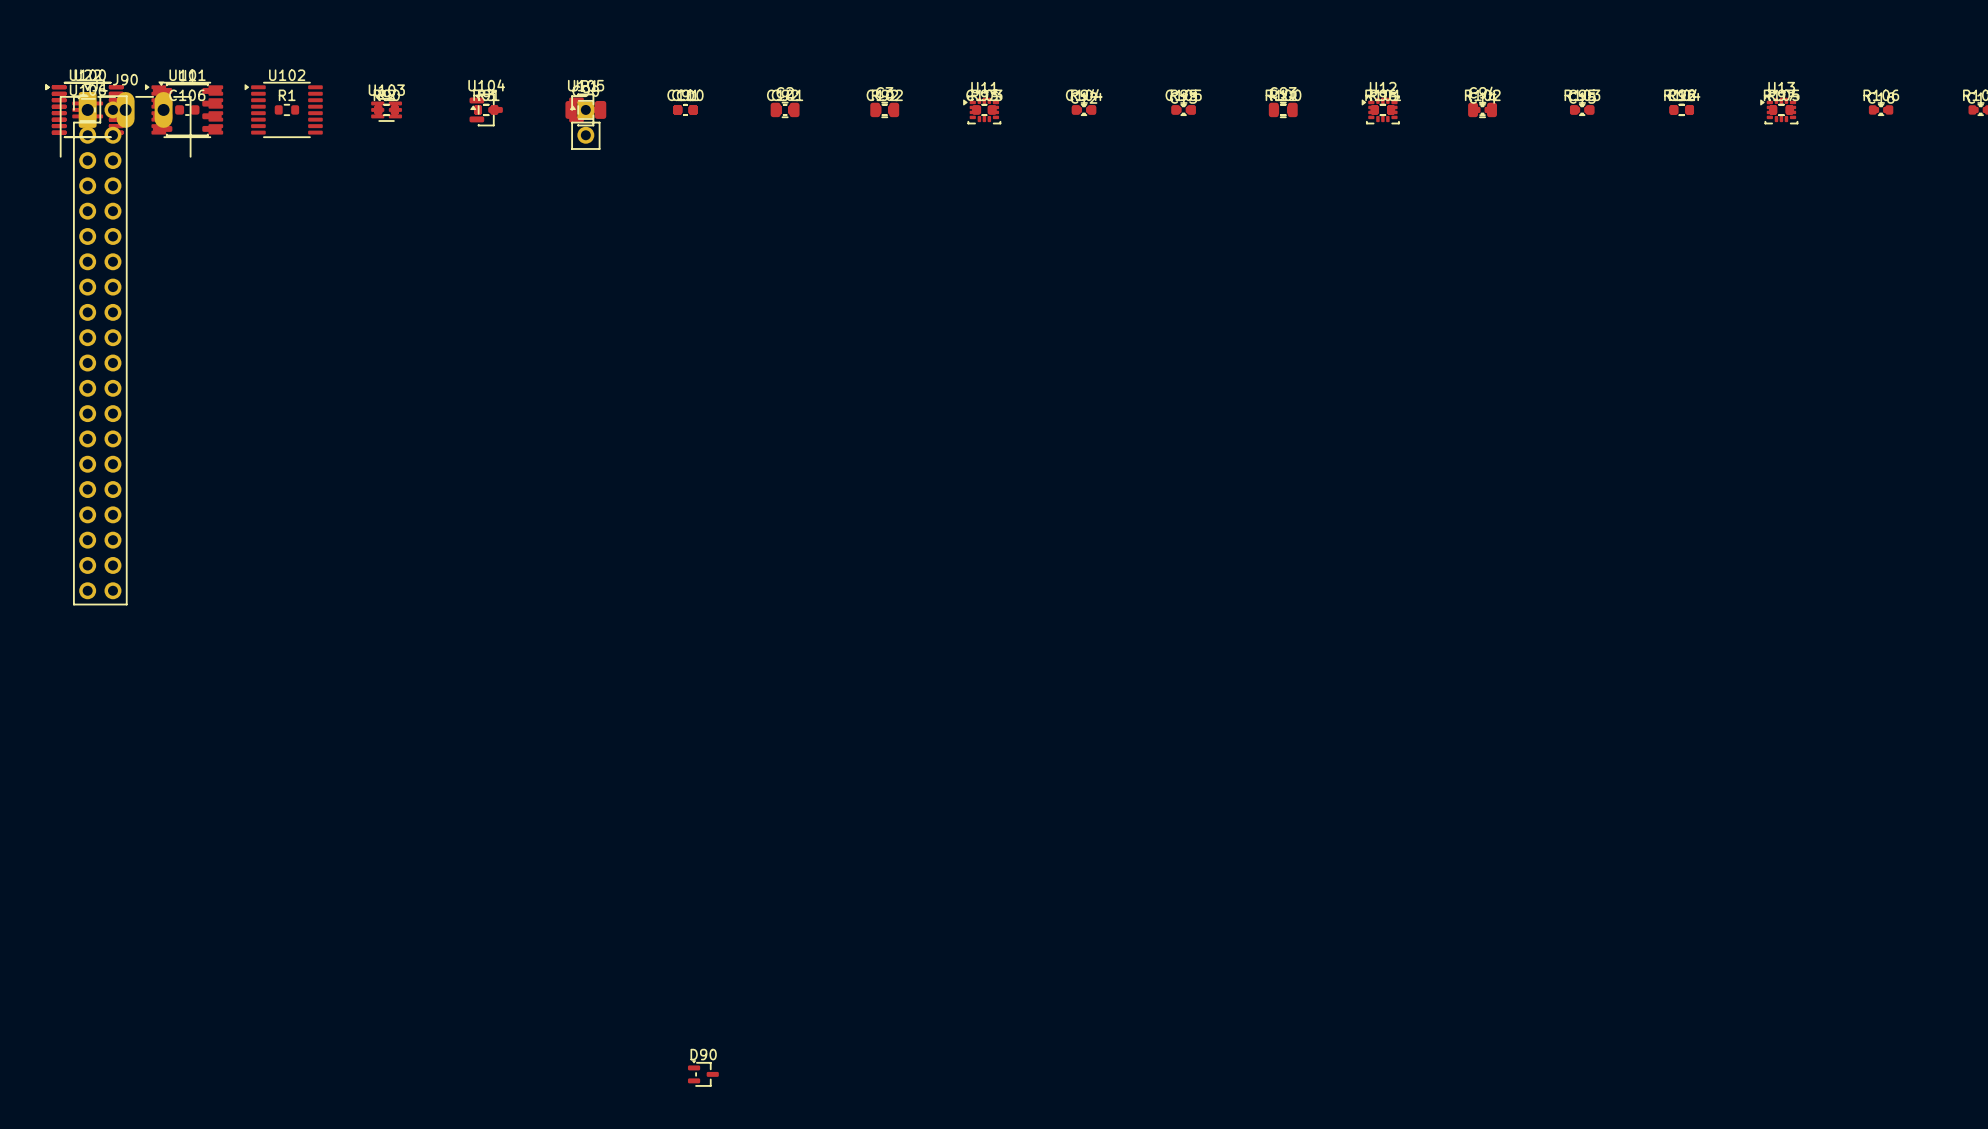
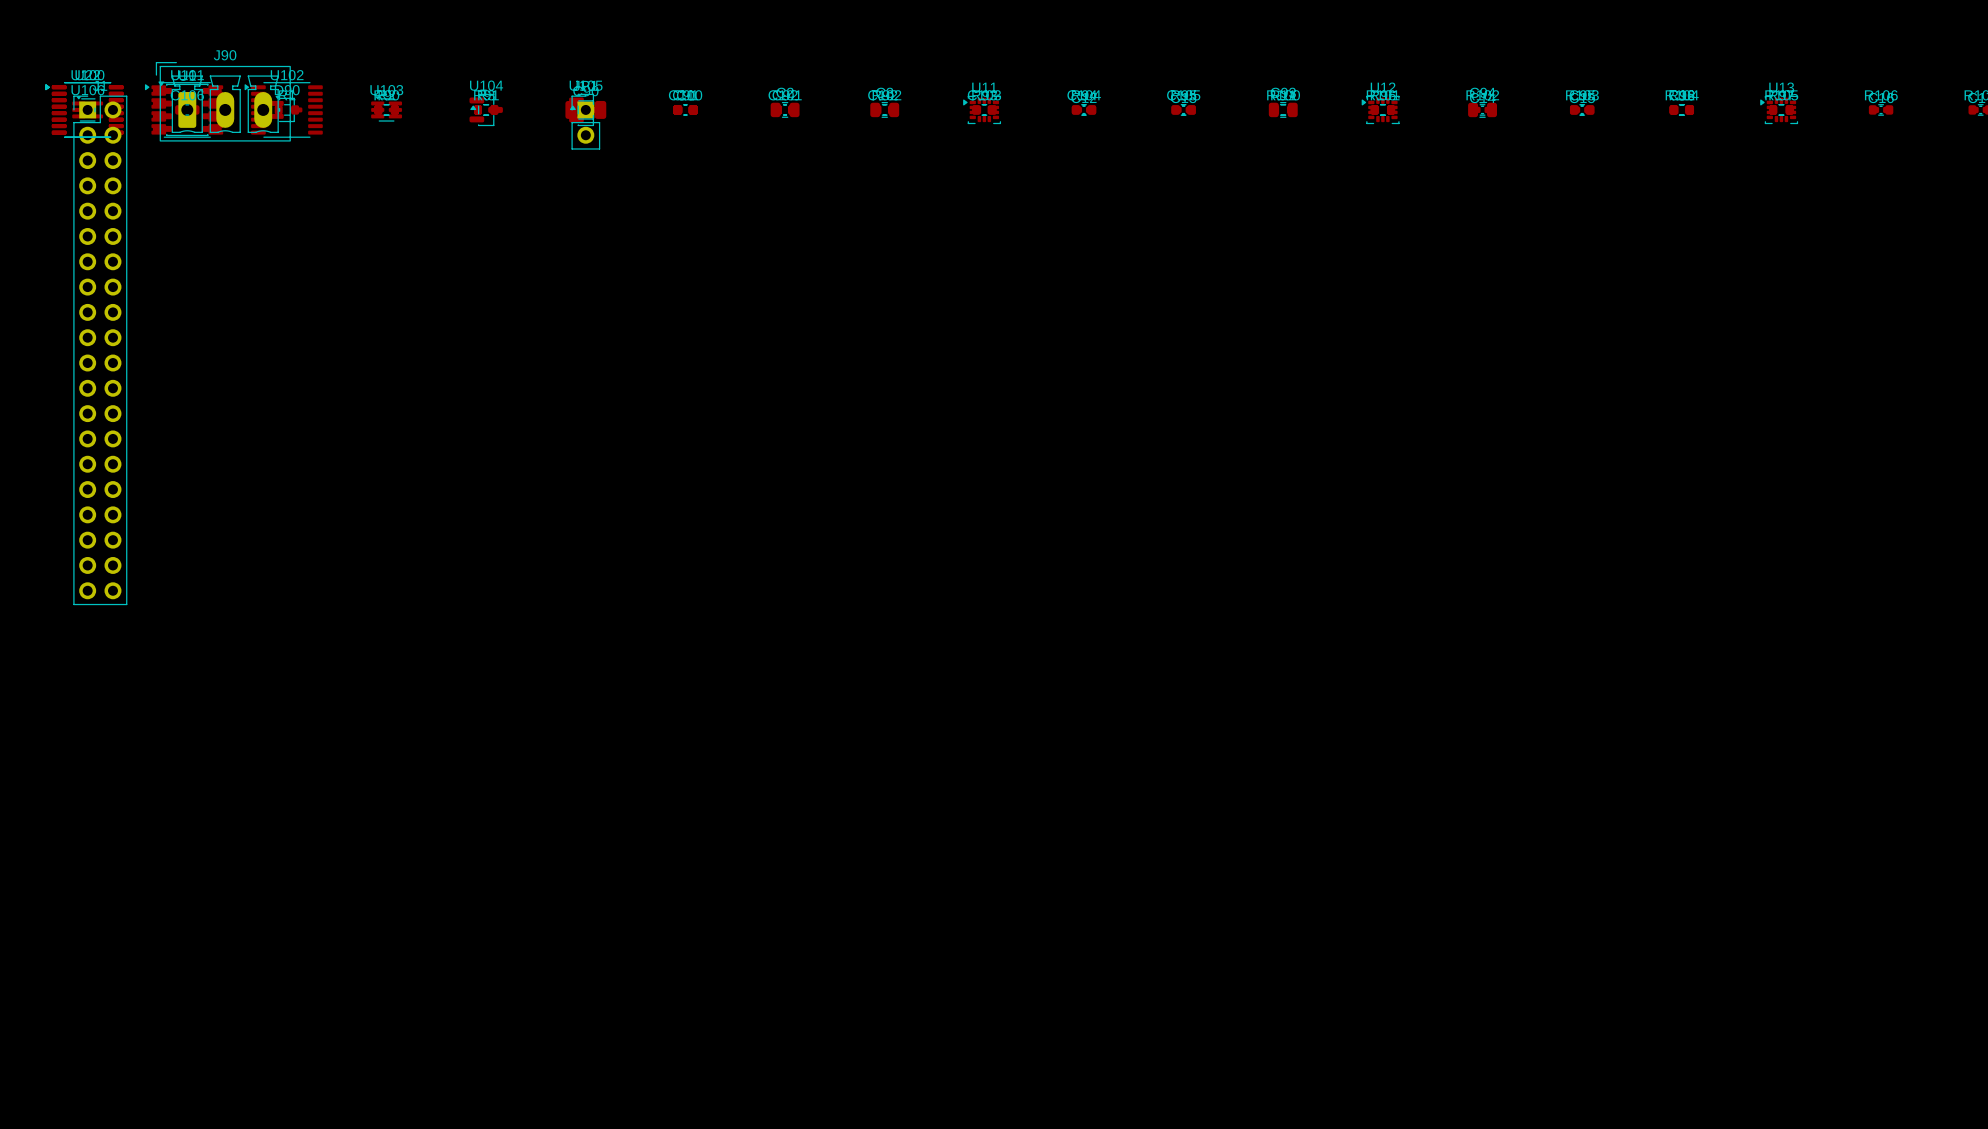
J90 footprint: [60, 83, 192, 158] -> [155, 62, 291, 142]
D90 position: (703, 1073) -> (286, 108)

